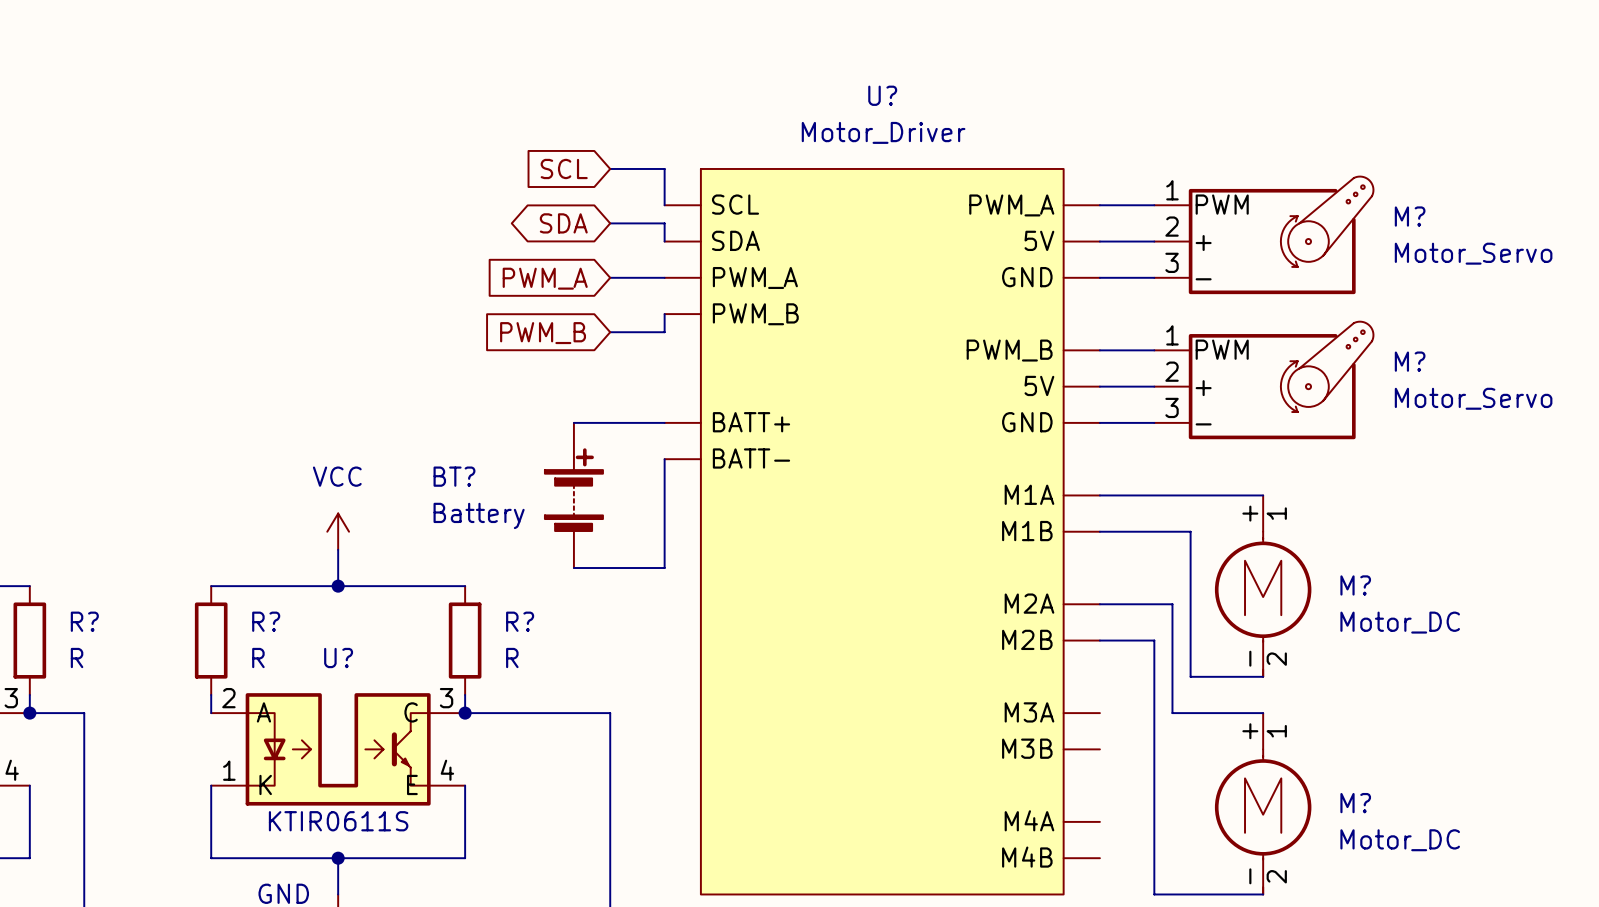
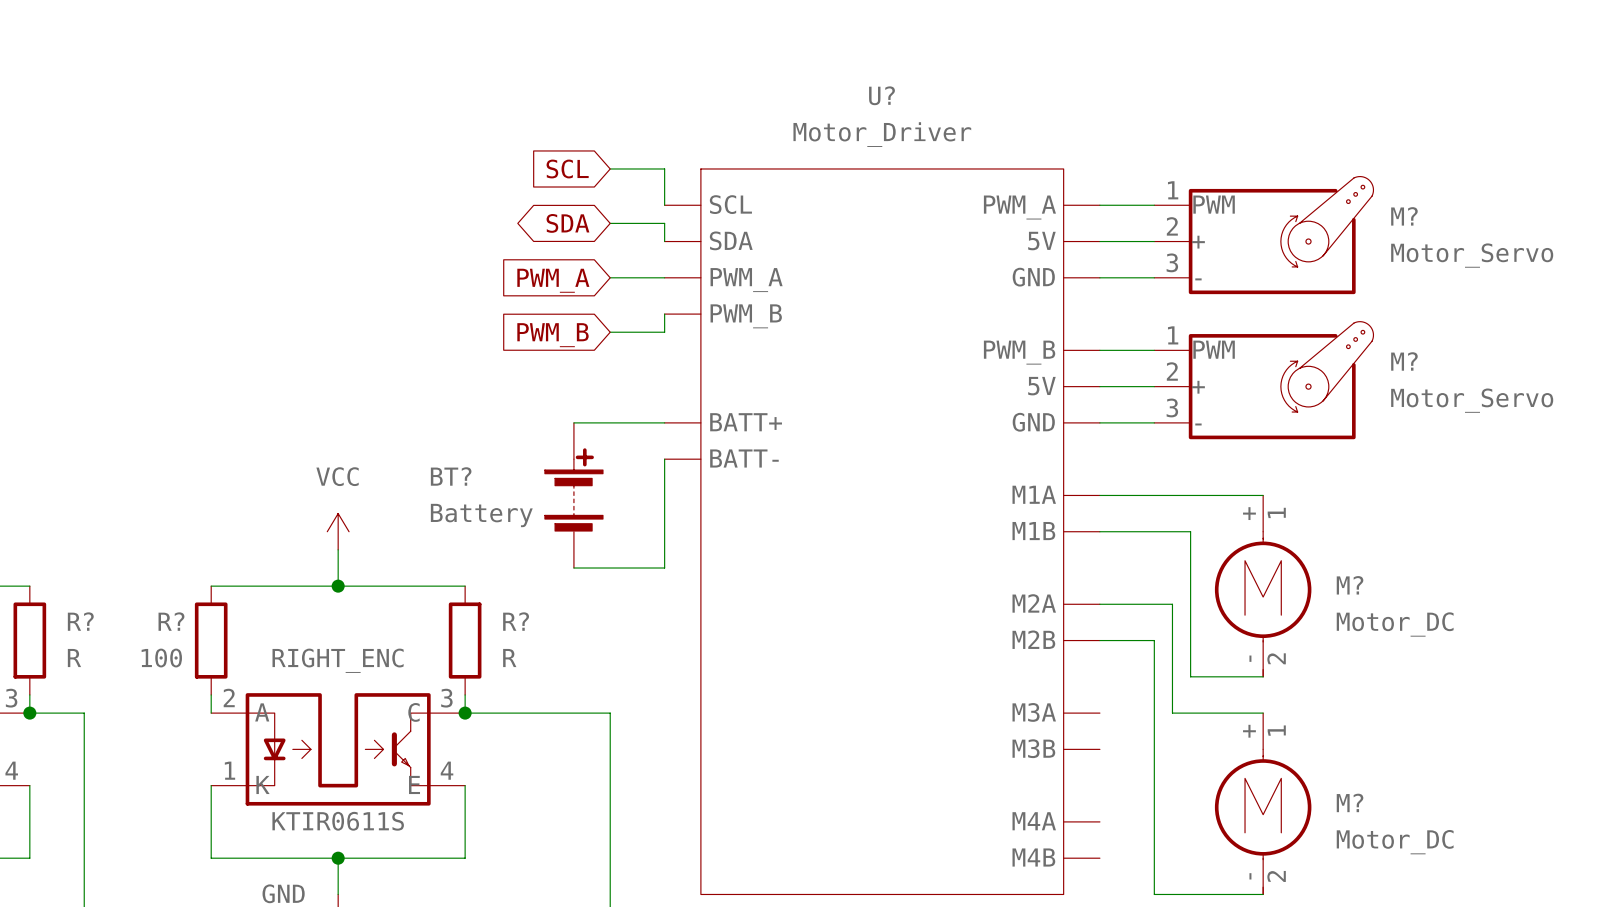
R? name position: R? (266, 621) -> R? (171, 621)
R? value: R (258, 658) -> 100 (161, 658)
U? name: U? (338, 658) -> RIGHT_ENC (338, 660)

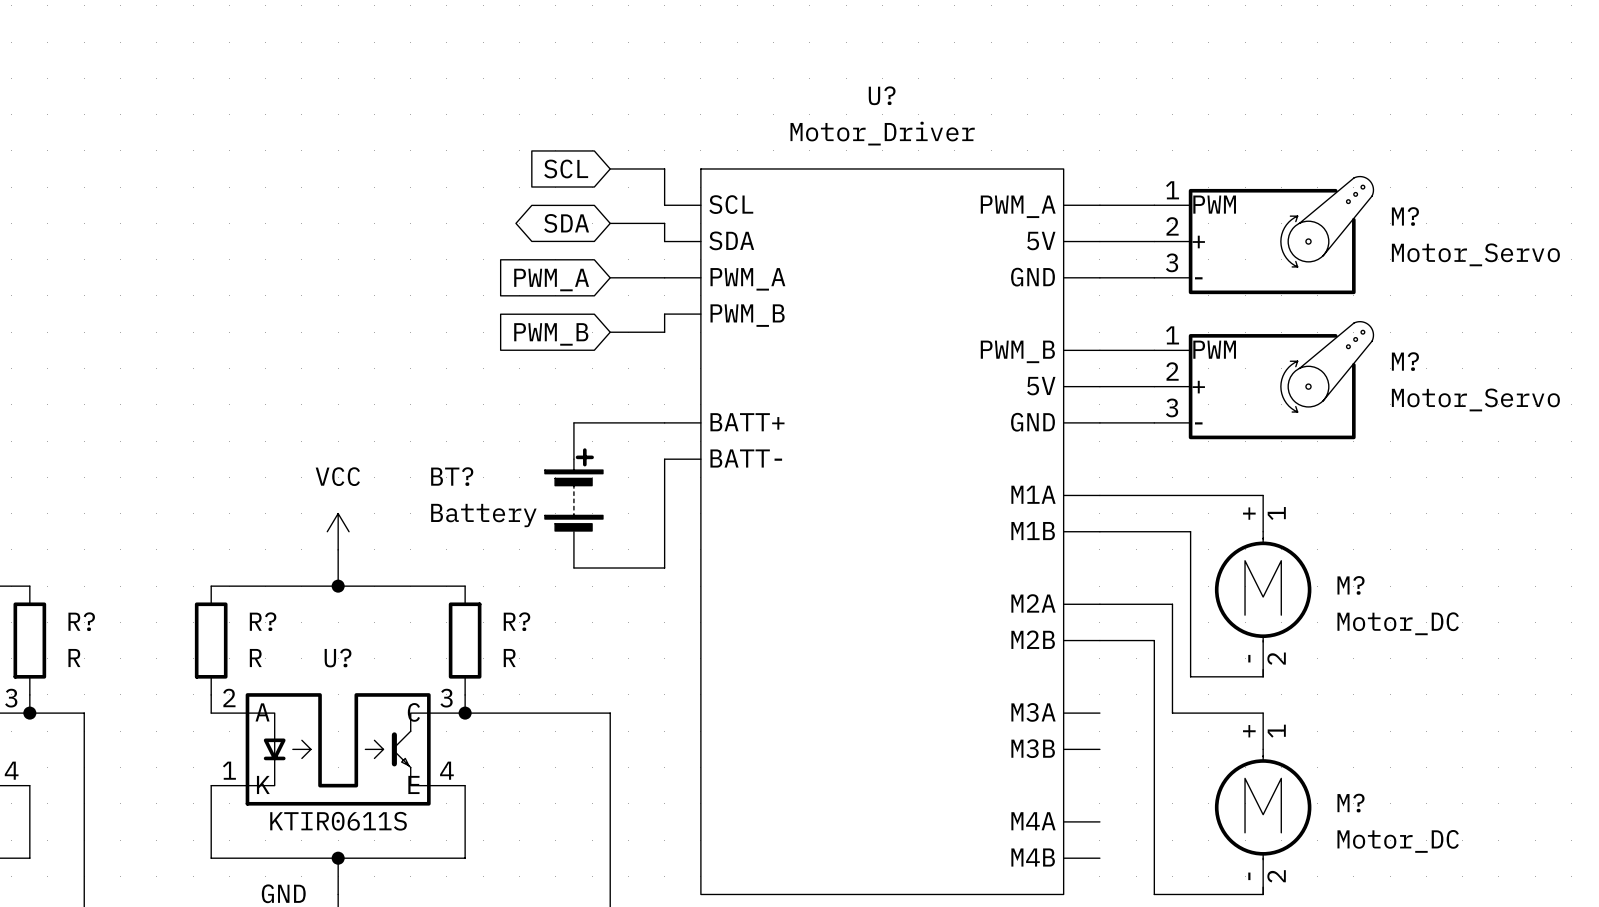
R? name position: R? (171, 621) -> R? (263, 621)
R? value: 100 (161, 658) -> R (255, 658)
RIGHT_ENC name: RIGHT_ENC (338, 660) -> U? (338, 658)

